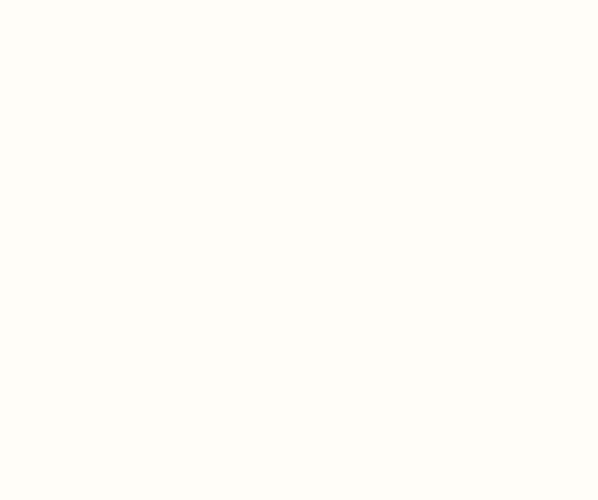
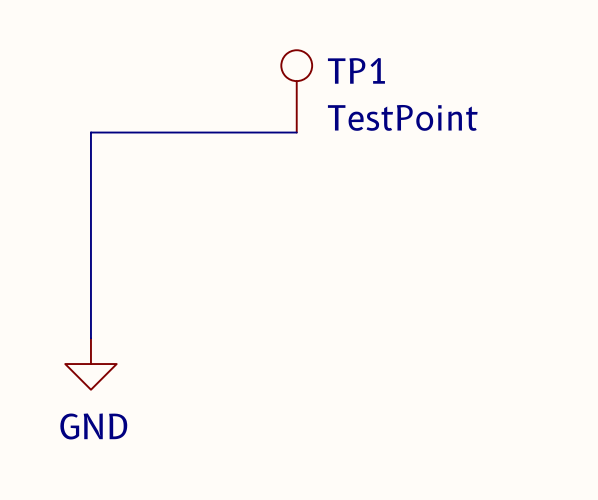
TP1: none -> TestPoint (296, 91)
wire: none -> (296, 132) (90, 132) (90, 338)
power symbol: none -> GND (90, 364)

